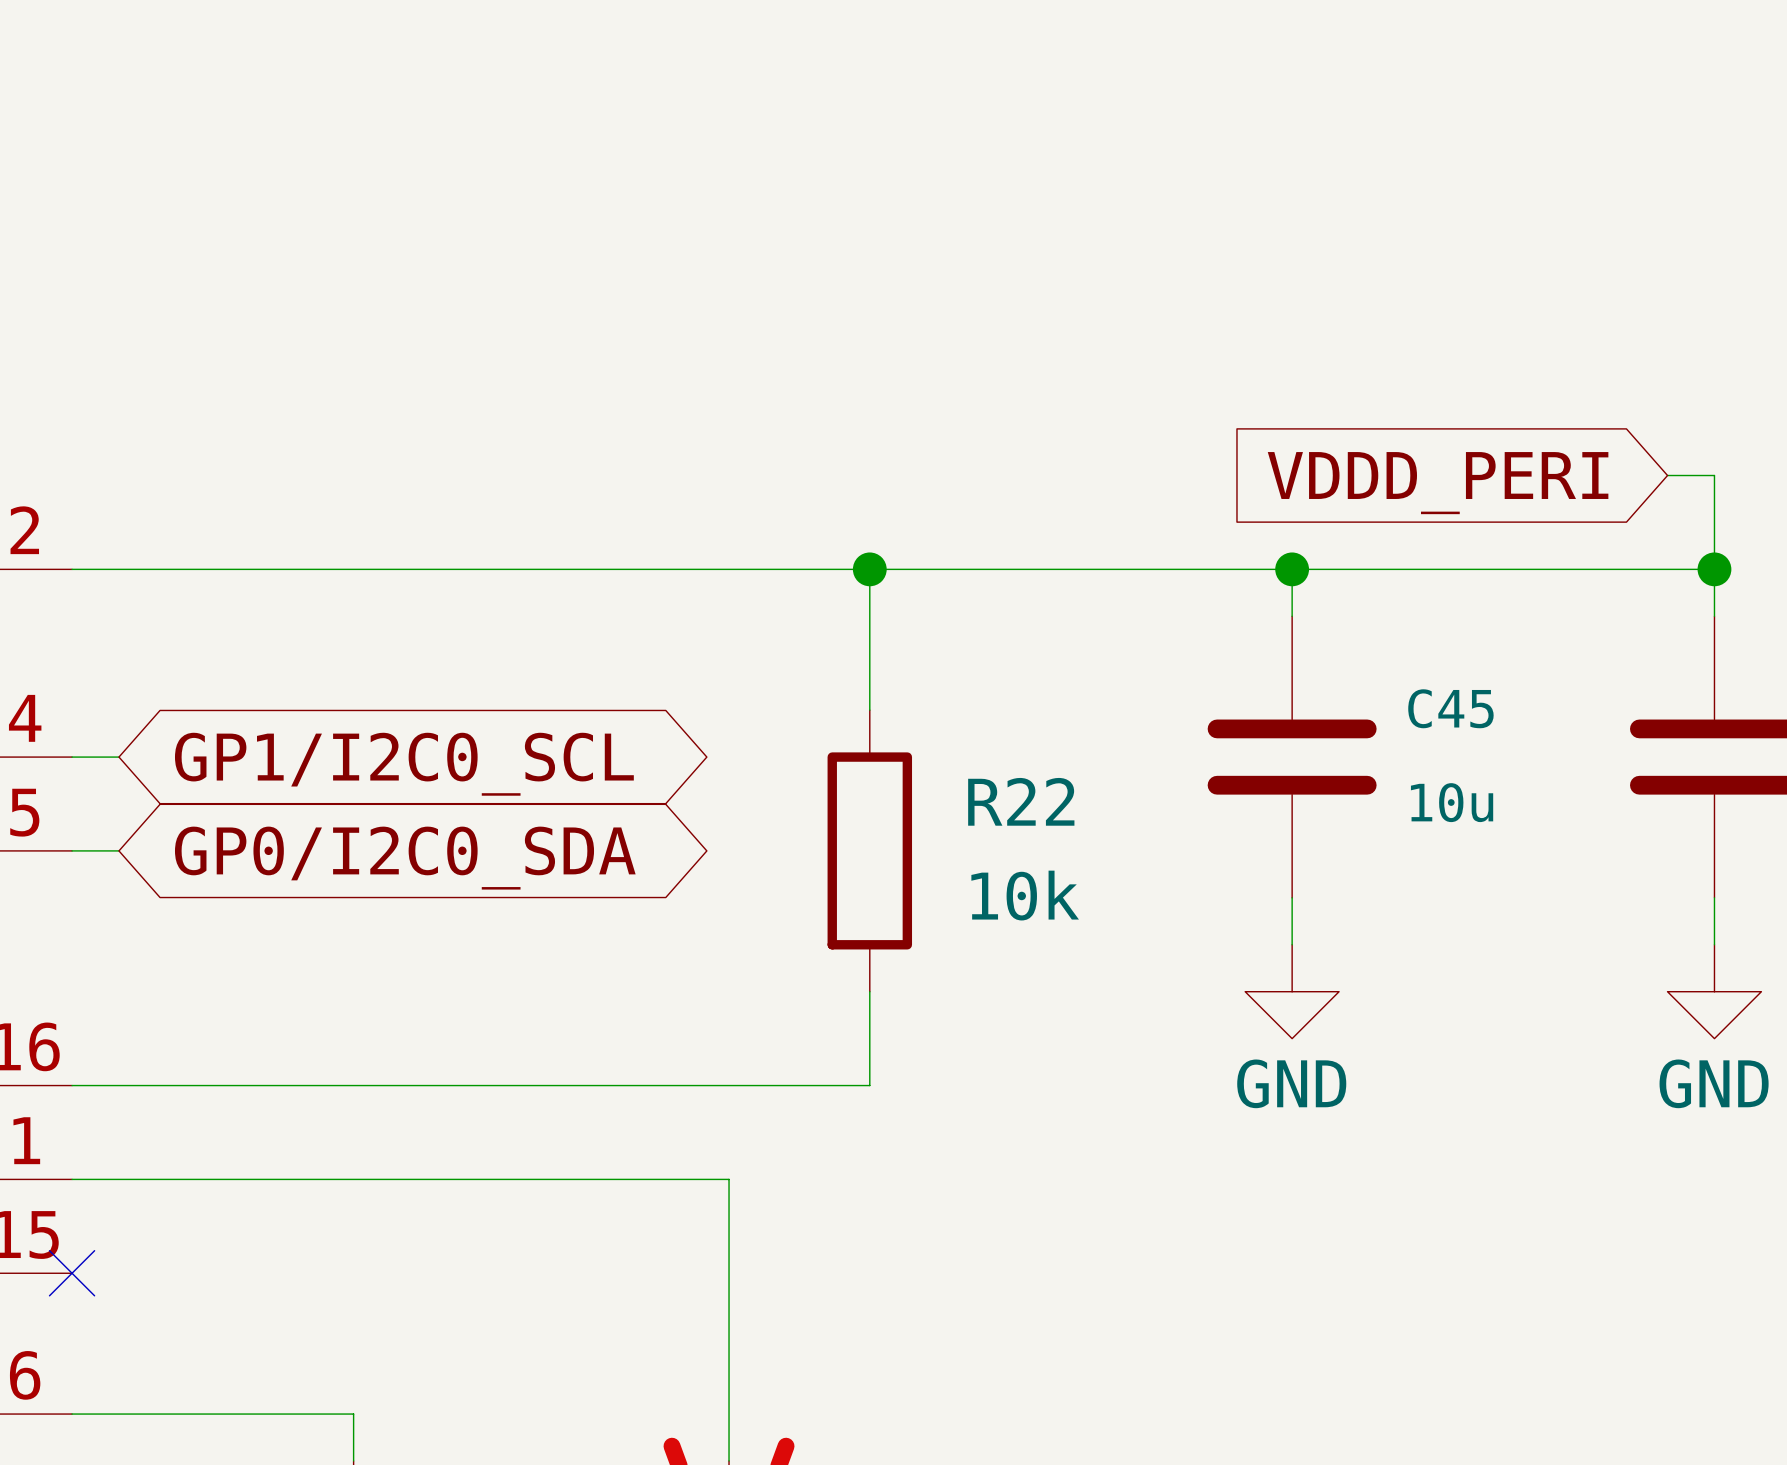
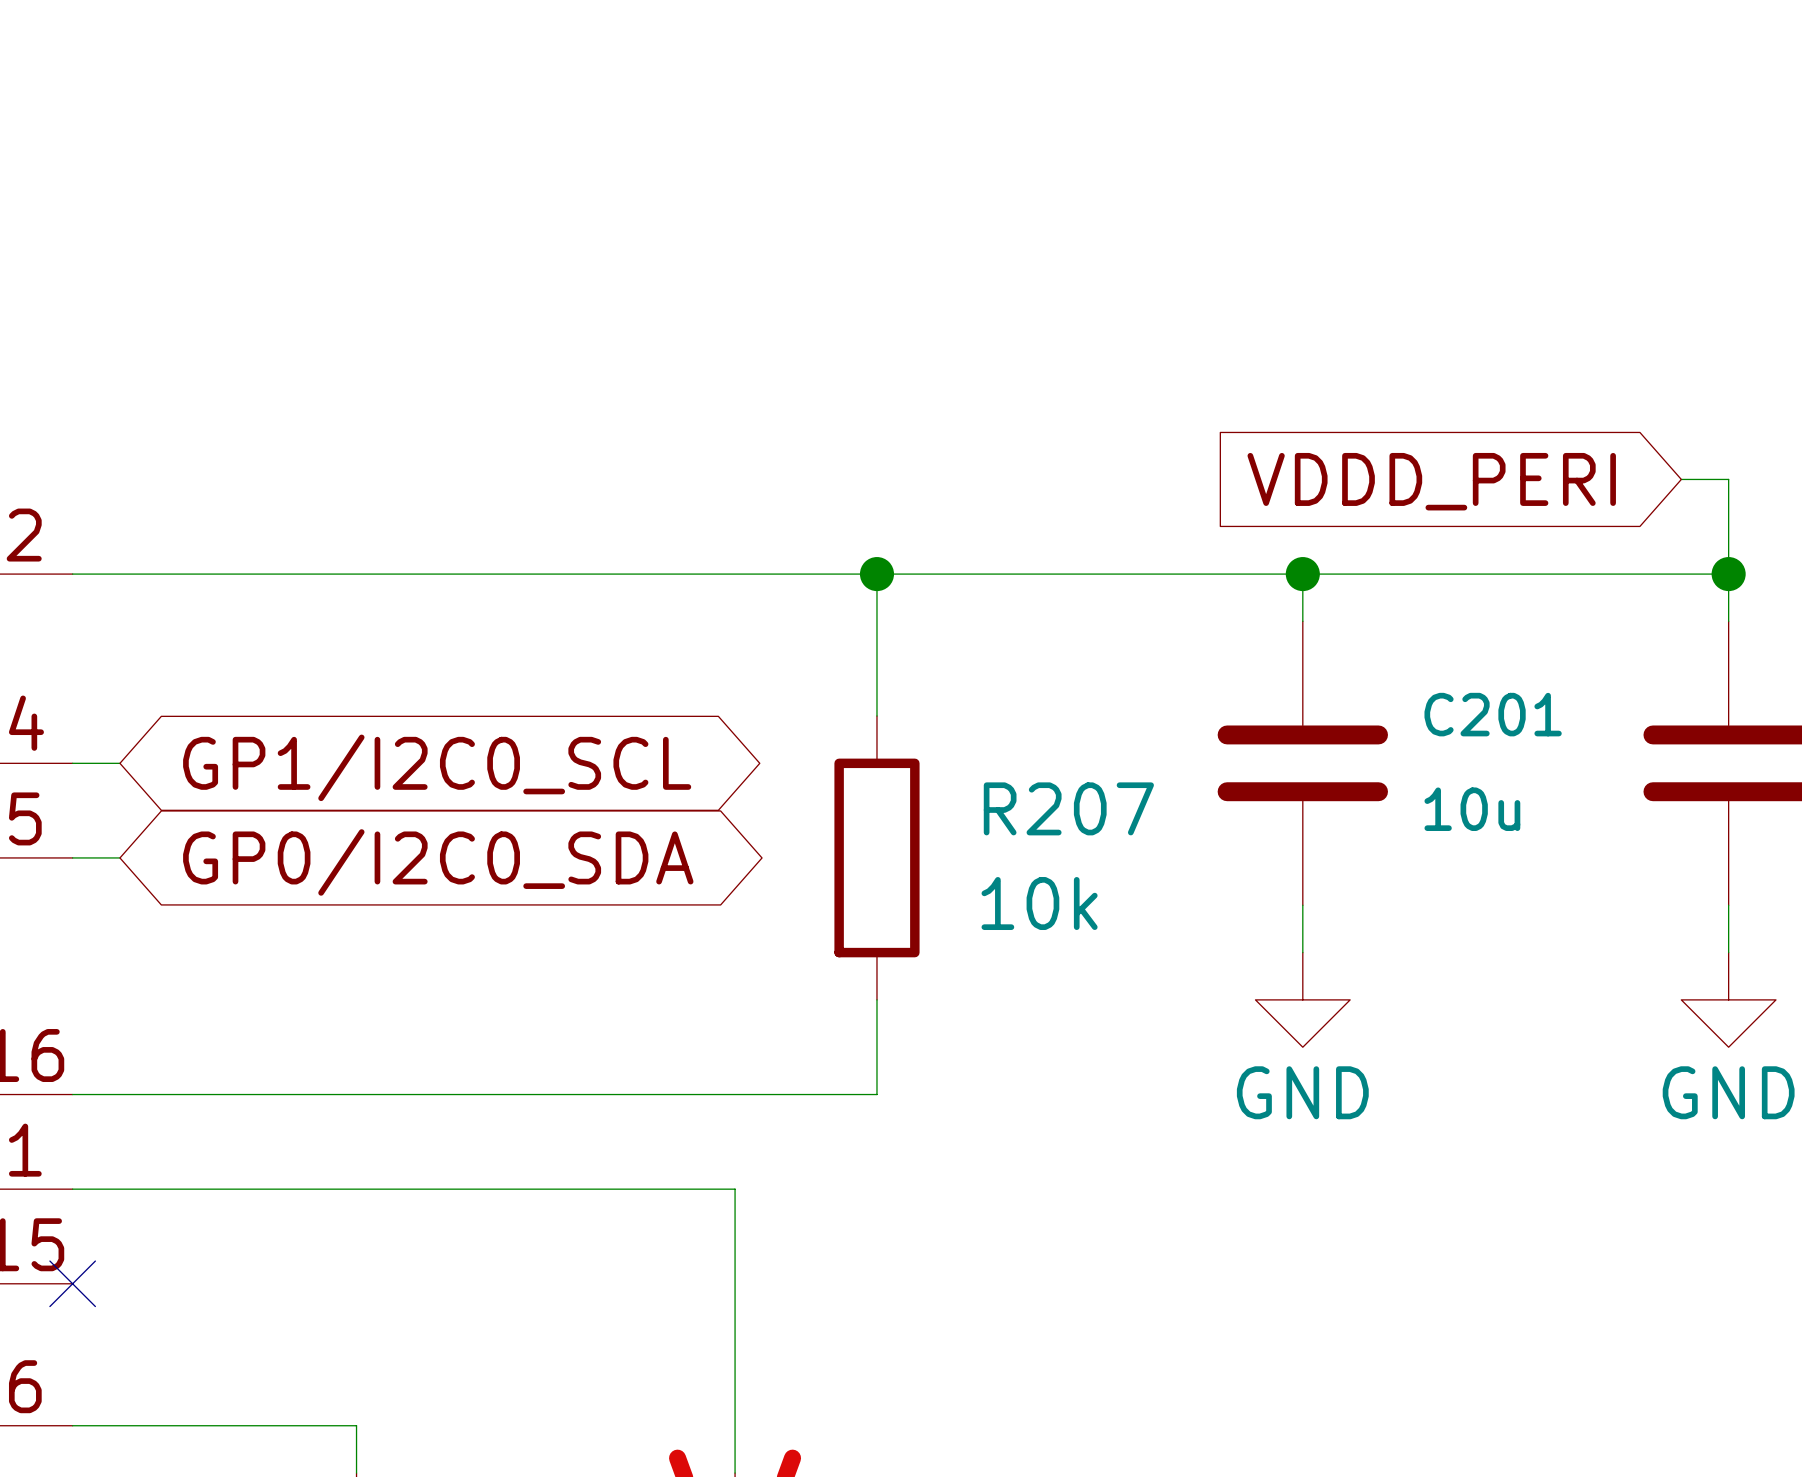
C45 name: C45 (1450, 708) -> C201 (1493, 714)
R22 name: R22 (1021, 801) -> R207 (1068, 808)

